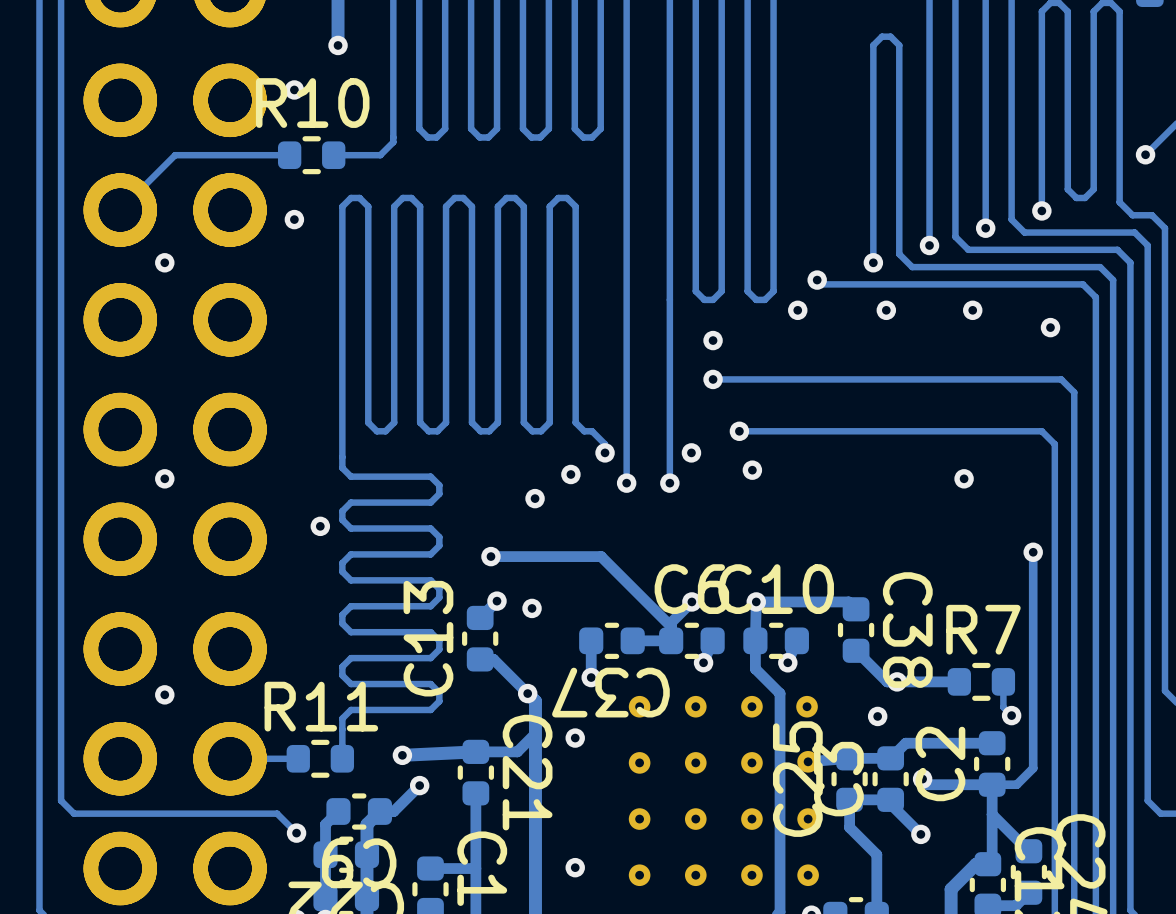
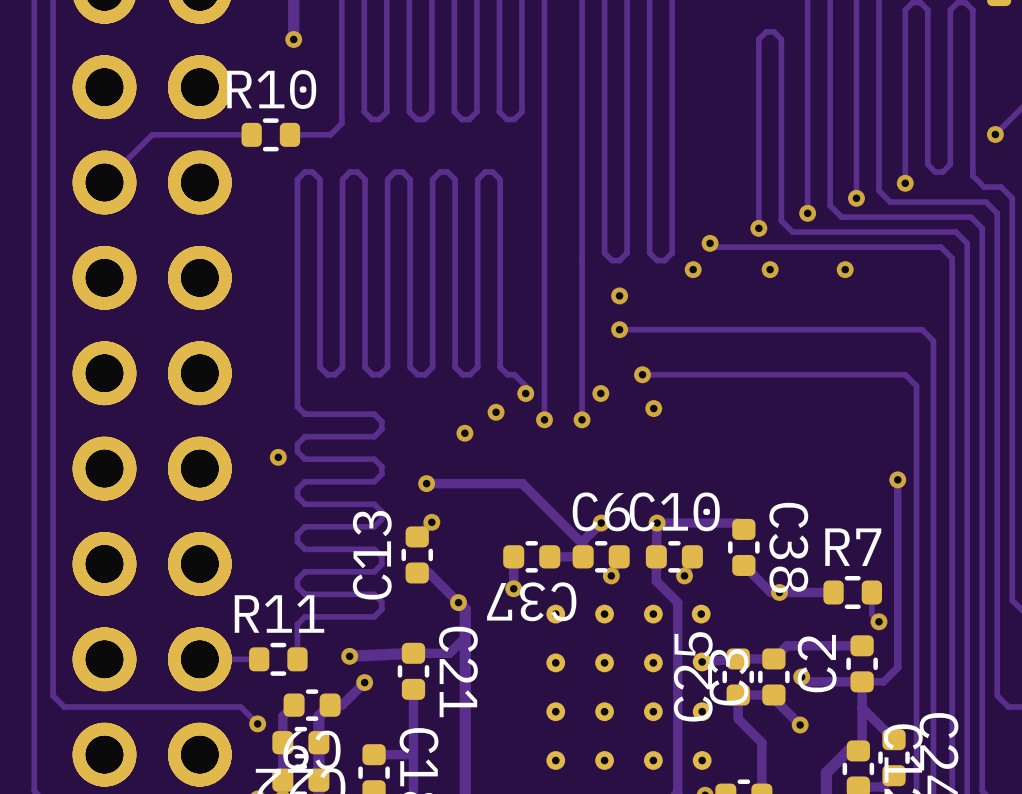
via: (294, 89) -> none
via: (294, 219) -> none
via: (164, 262) -> none
via: (1050, 327) -> none
via: (164, 478) -> none
via: (964, 478) -> none
via: (532, 608) -> none
via: (164, 694) -> none
via: (877, 716) -> none
via: (575, 738) -> none
via: (575, 867) -> none

